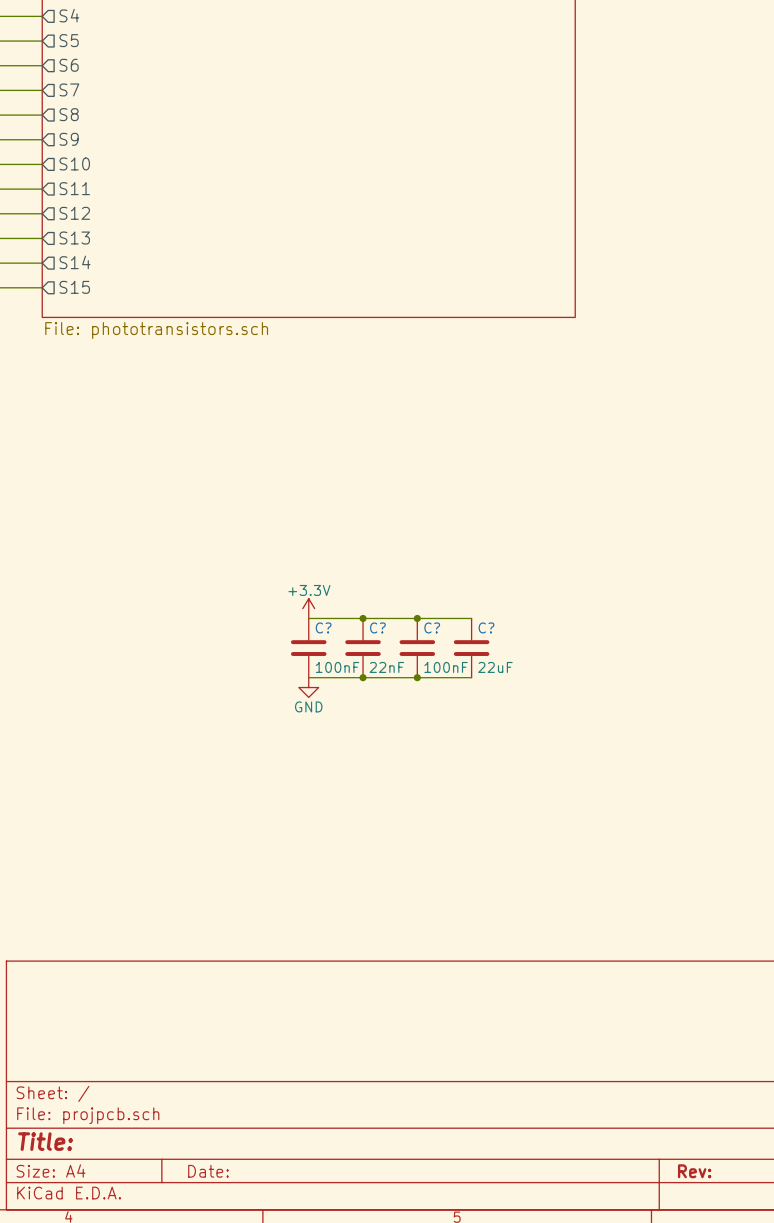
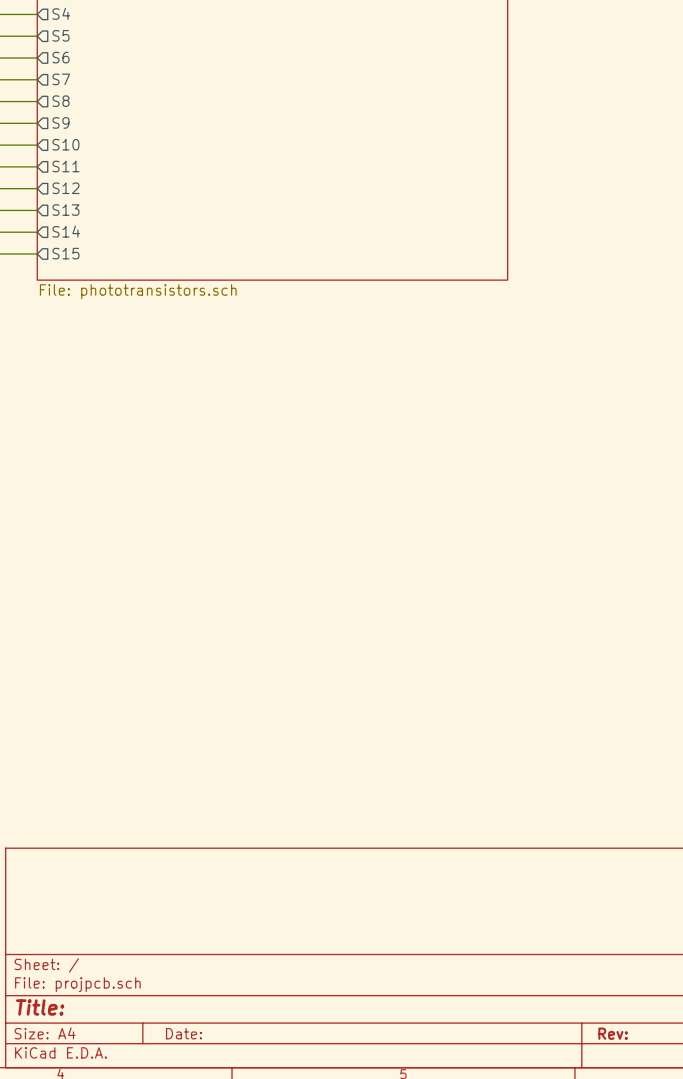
power symbol: +3.3V (308, 608) -> none
wire: (308, 618) (471, 618) -> none
junction: (363, 618) -> none
junction: (417, 618) -> none
C?: 100nF (308, 648) -> none
C?: 22nF (363, 648) -> none
C?: 100nF (417, 648) -> none
C?: 22uF (471, 648) -> none
wire: (308, 677) (471, 677) -> none
junction: (363, 677) -> none
junction: (417, 677) -> none
power symbol: GND (308, 687) -> none

